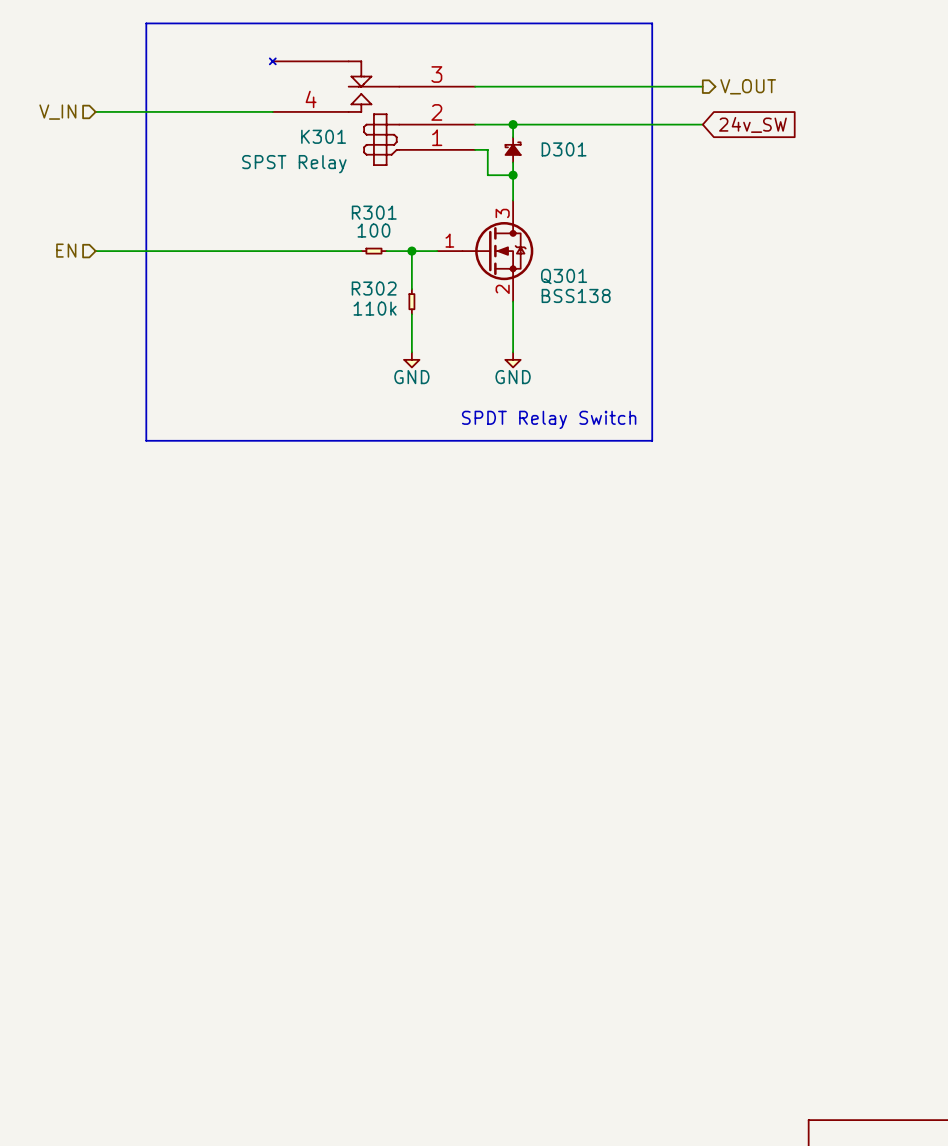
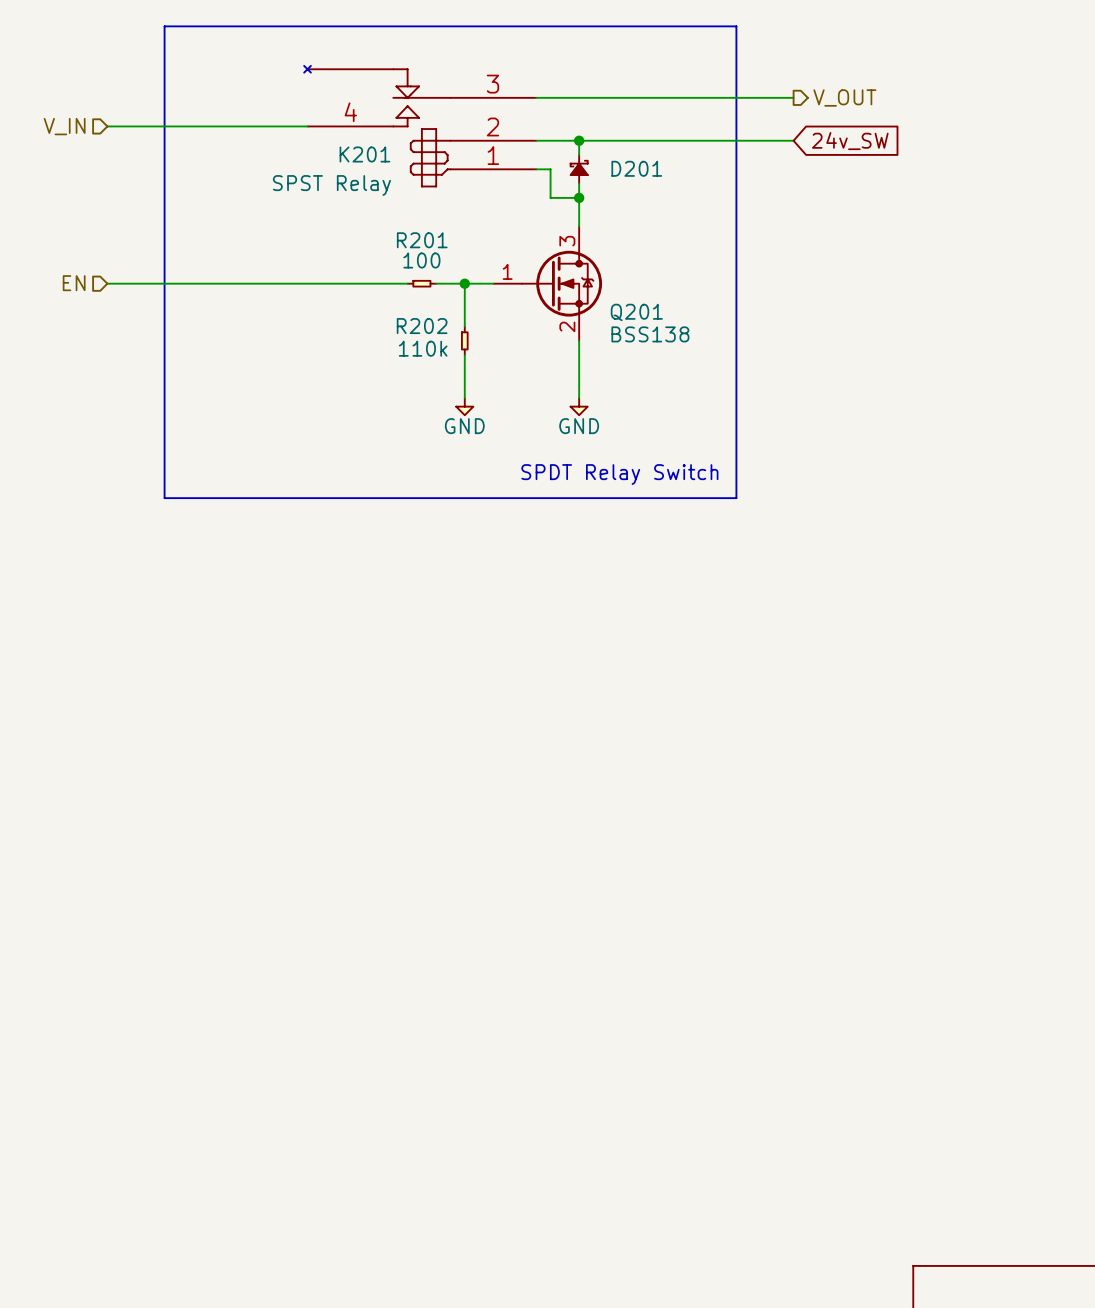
K301 name: K301 (323, 136) -> K201 (364, 154)
D301 name: D301 (564, 149) -> D201 (636, 168)
R301 name: R301 (374, 212) -> R201 (422, 240)
Q301 name: Q301 (564, 276) -> Q201 (636, 312)
R302 name: R302 (374, 288) -> R202 (422, 326)

